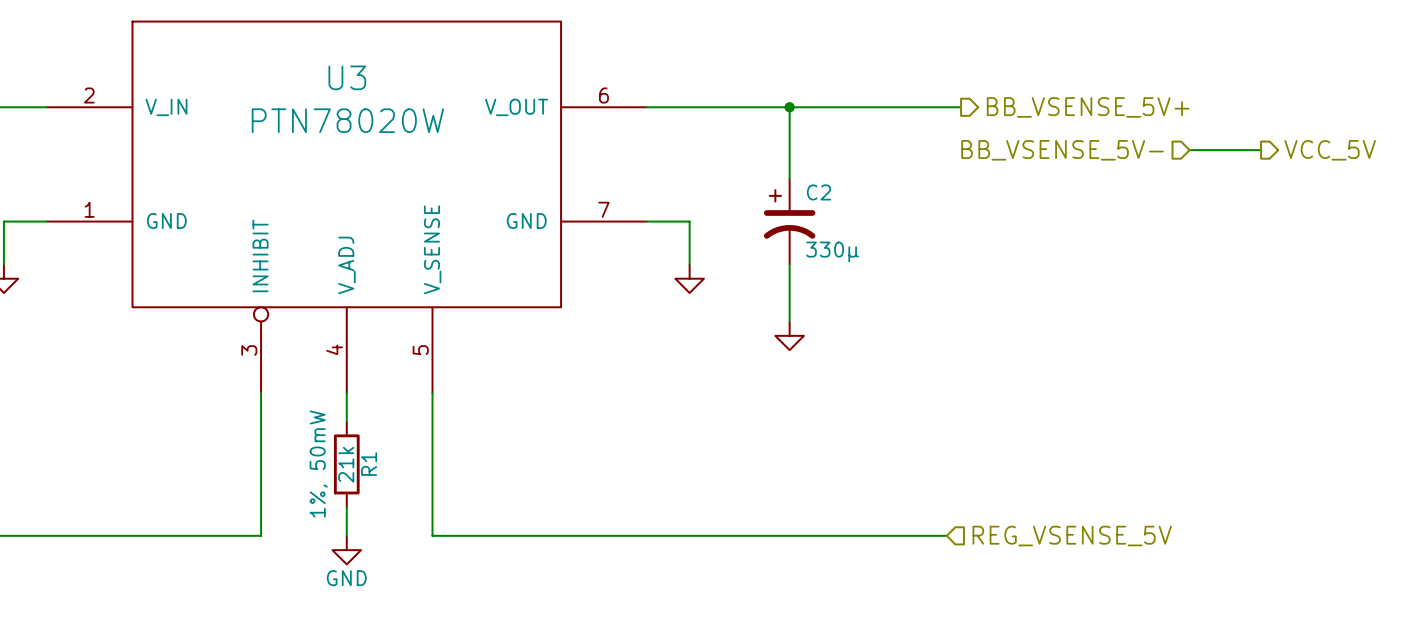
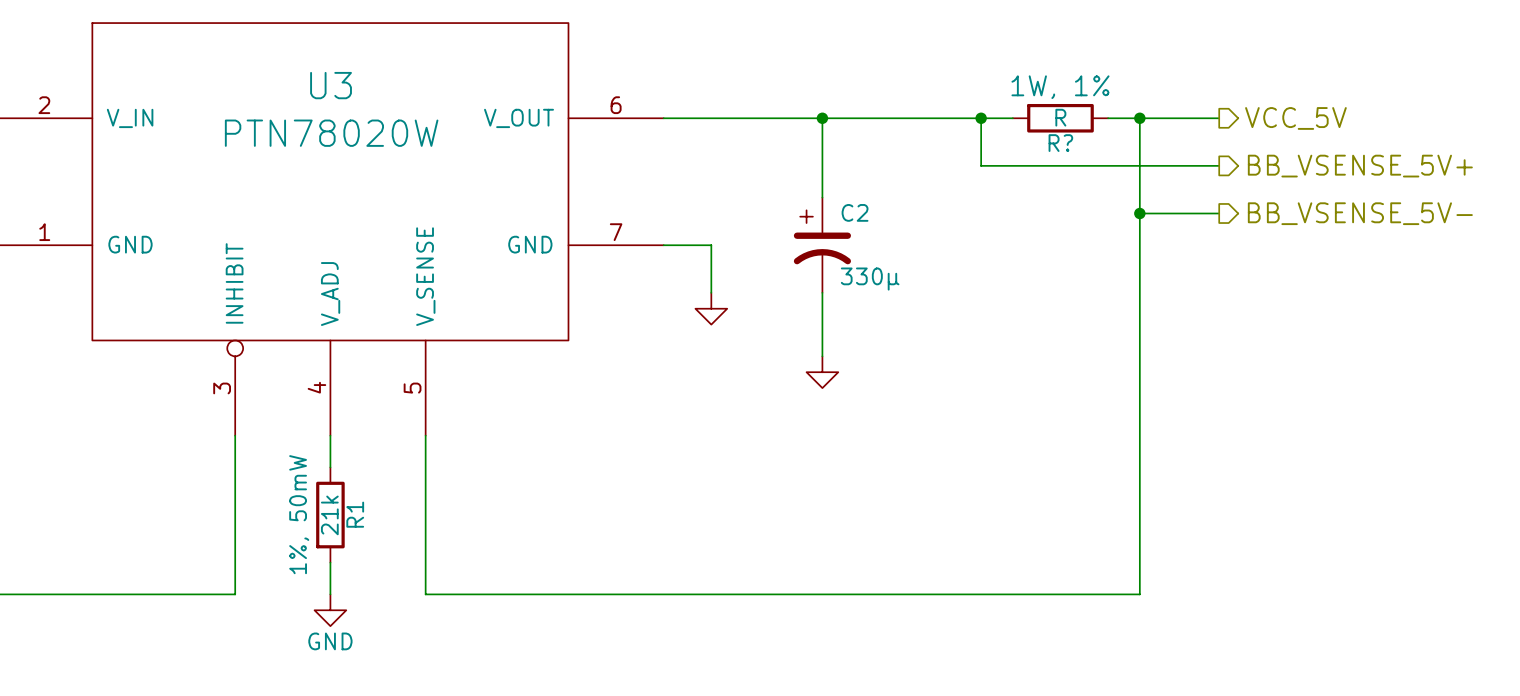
wire: none -> (981, 118) (981, 165) (1219, 165)
junction: none -> (981, 118)
R?: none -> R (1060, 118)
wire: none -> (1108, 118) (1219, 118)
wire: none -> (1139, 118) (1139, 594) (997, 594)
junction: none -> (1139, 118)
hierarchical label: BB_VSENSE_5V+ (1088, 107) -> none
hierarchical label shape: input (1062, 150) -> output (1360, 166)
hierarchical label: BB_VSENSE_5V- (1062, 150) -> BB_VSENSE_5V+ (1360, 166)
wire: (1189, 150) (1261, 150) -> (1139, 213) (1219, 213)
hierarchical label position: VCC_5V (1330, 150) -> VCC_5V (1295, 118)
junction: none -> (1139, 213)
hierarchical label: none -> BB_VSENSE_5V- (1360, 213)
hierarchical label: REG_VSENSE_5V (1072, 536) -> none

